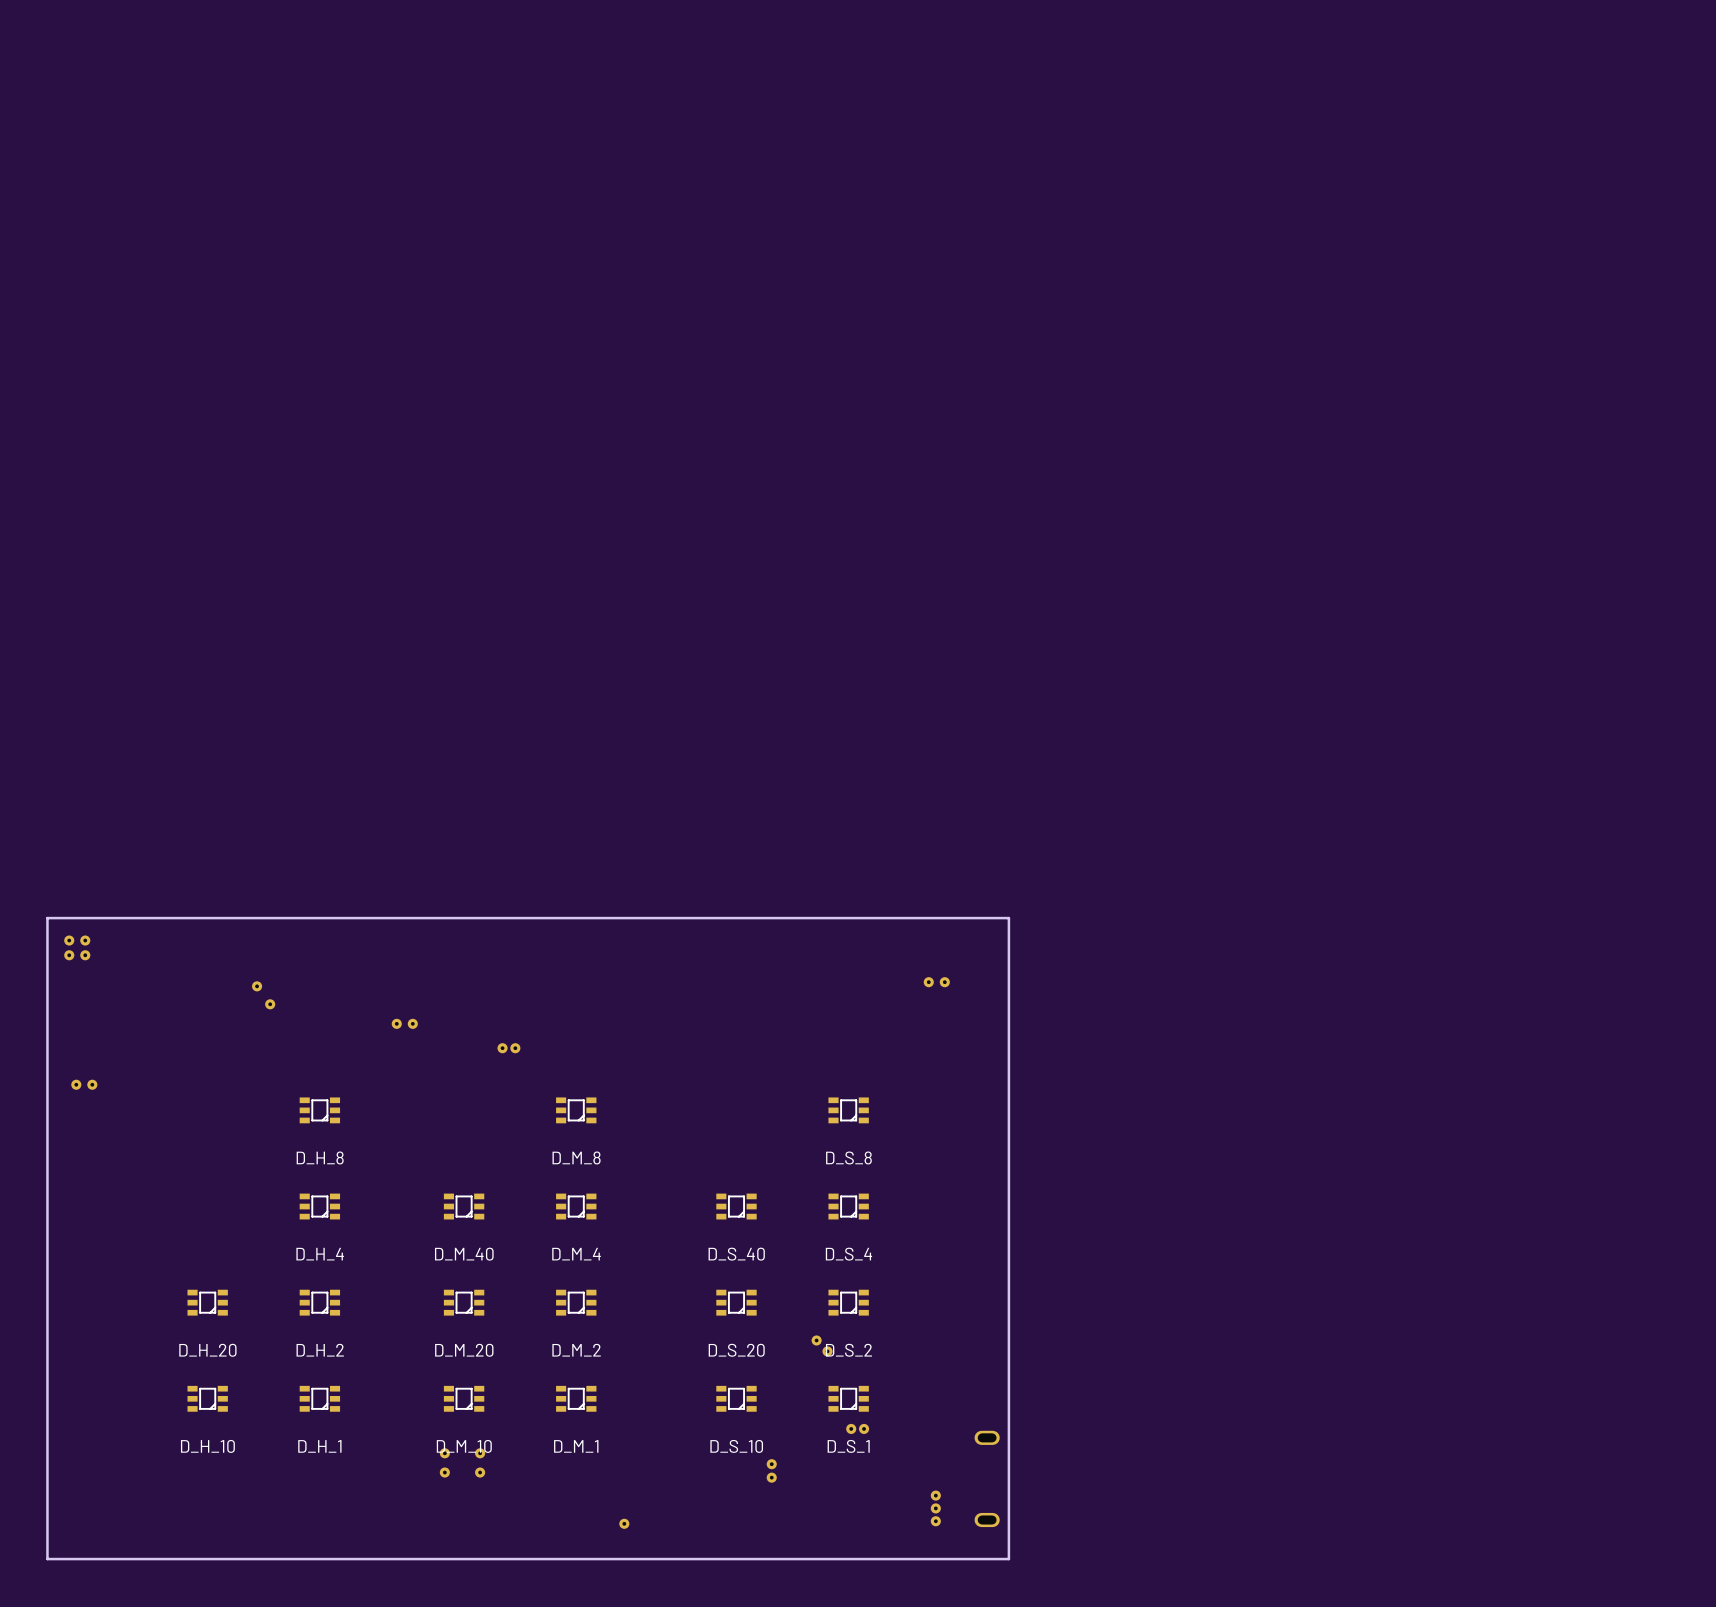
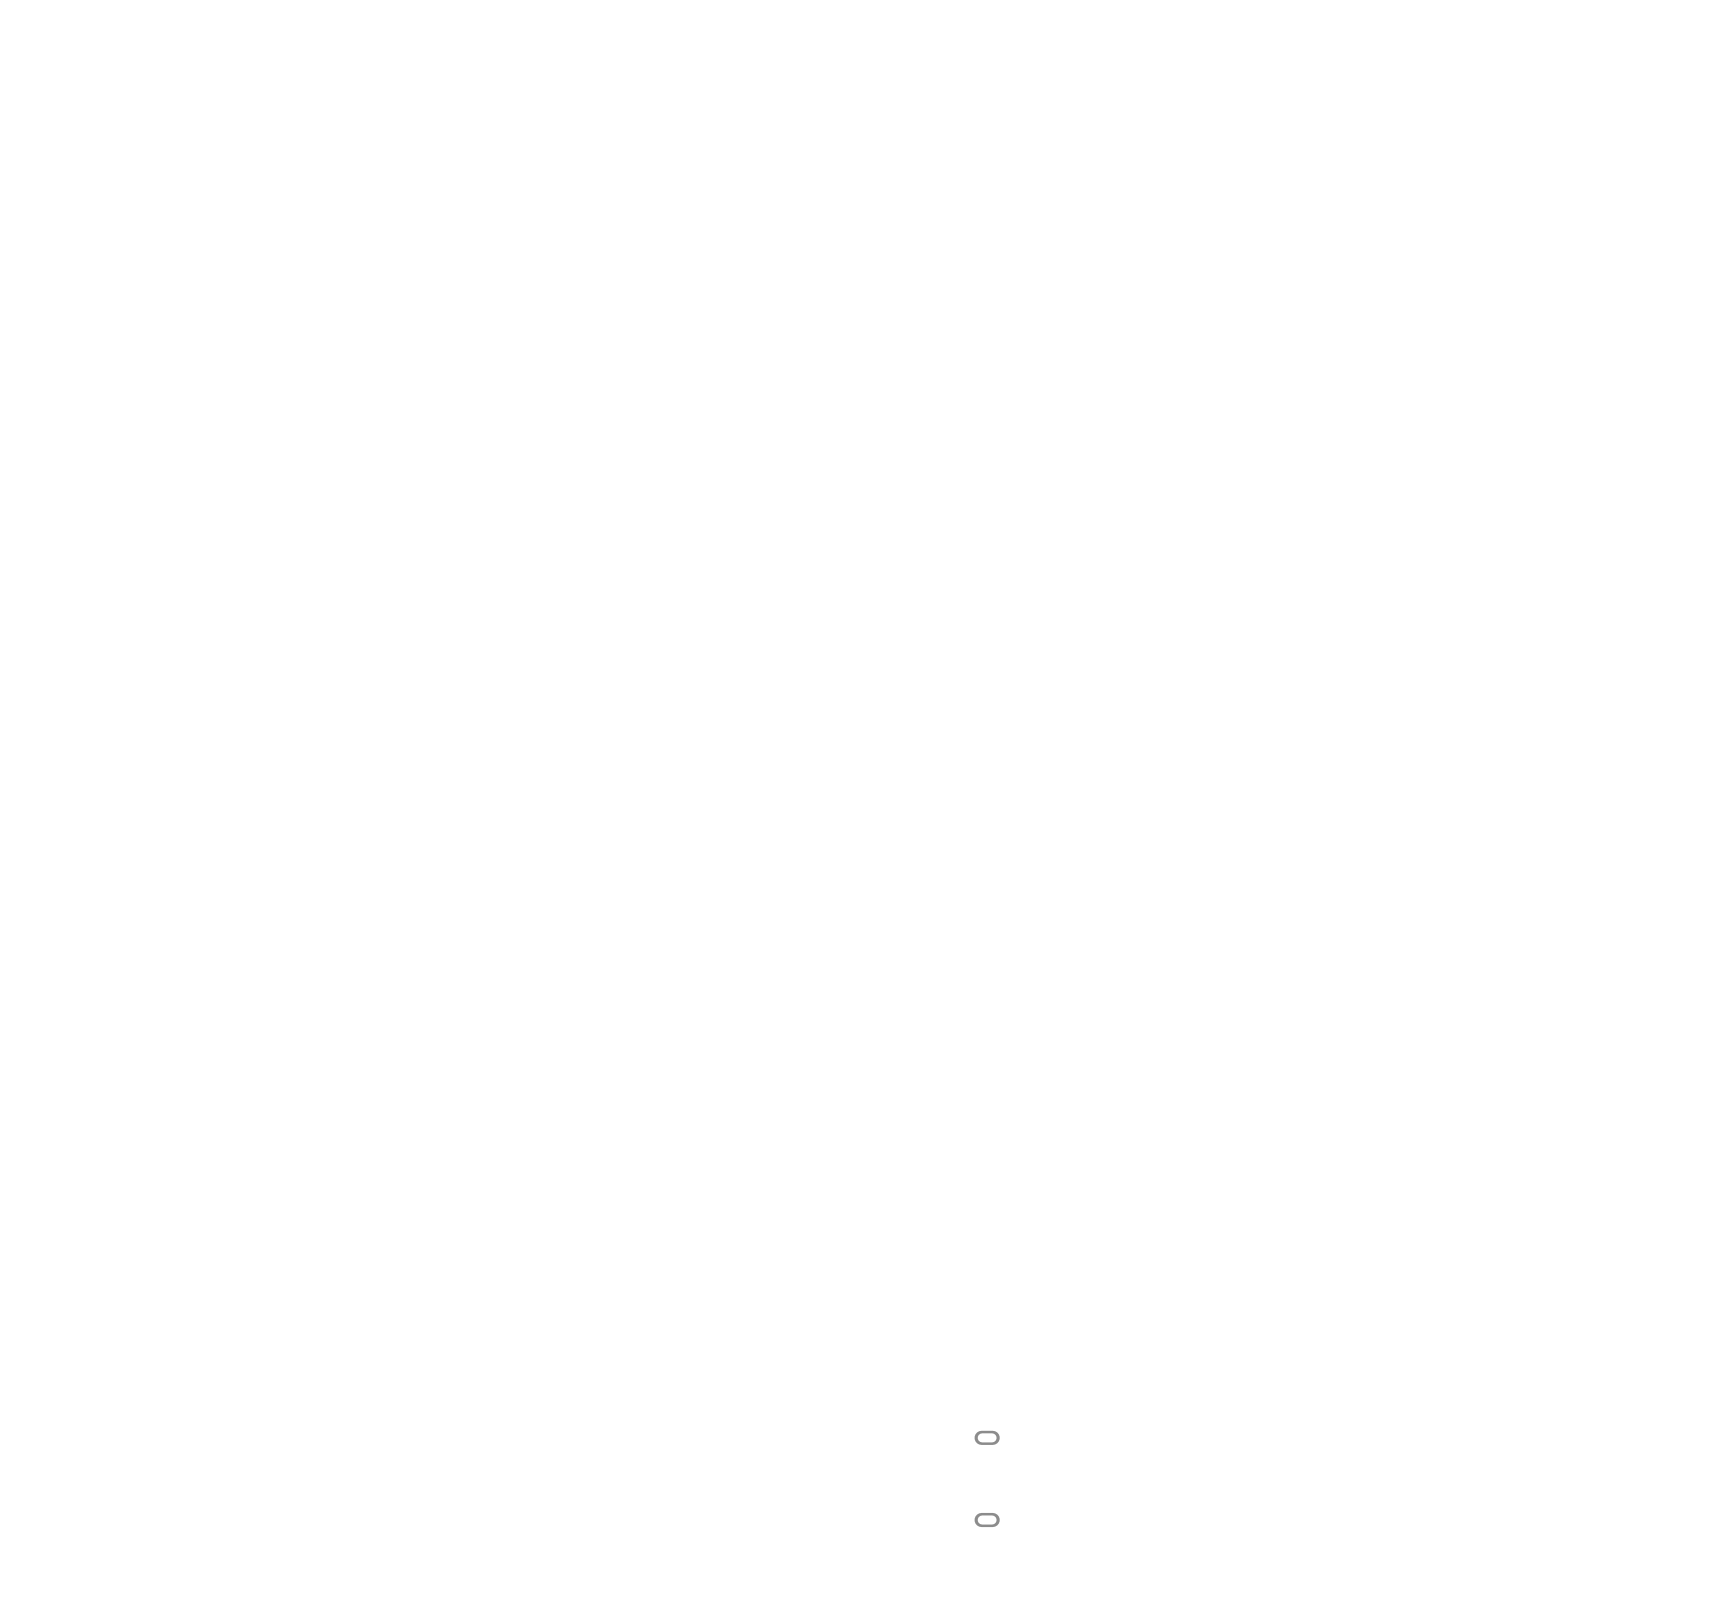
board edge: (1008, 918) (1008, 1559) (47, 1559) (47, 918) (1008, 918) -> none
part: (69, 940) -> none
part: (85, 940) -> none
part: (69, 955) -> none
part: (85, 955) -> none
part: (928, 982) -> none
part: (944, 982) -> none
part: (257, 986) -> none
part: (270, 1004) -> none
part: (396, 1023) -> none
part: (412, 1023) -> none
part: (502, 1048) -> none
part: (515, 1048) -> none
part: (76, 1084) -> none
part: (92, 1084) -> none
D_H_8: (319, 1110) -> none
D_M_8: (576, 1110) -> none
D_S_8: (848, 1110) -> none
D_H_4: (319, 1206) -> none
D_M_40: (464, 1206) -> none
D_M_4: (576, 1206) -> none
D_S_40: (736, 1206) -> none
D_S_4: (848, 1206) -> none
D_H_20: (207, 1302) -> none
D_H_2: (319, 1302) -> none
D_M_20: (464, 1302) -> none
D_M_2: (576, 1302) -> none
D_S_20: (736, 1302) -> none
D_S_2: (848, 1302) -> none
part: (816, 1340) -> none
part: (827, 1351) -> none
D_H_10: (207, 1398) -> none
D_H_1: (319, 1398) -> none
D_M_10: (464, 1398) -> none
D_M_1: (576, 1398) -> none
D_S_10: (736, 1398) -> none
D_S_1: (848, 1398) -> none
part: (851, 1428) -> none
part: (864, 1428) -> none
part: (444, 1453) -> none
part: (480, 1453) -> none
part: (771, 1464) -> none
part: (444, 1472) -> none
part: (480, 1472) -> none
part: (771, 1477) -> none
part: (935, 1495) -> none
part: (935, 1508) -> none
part: (935, 1521) -> none
part: (624, 1523) -> none

